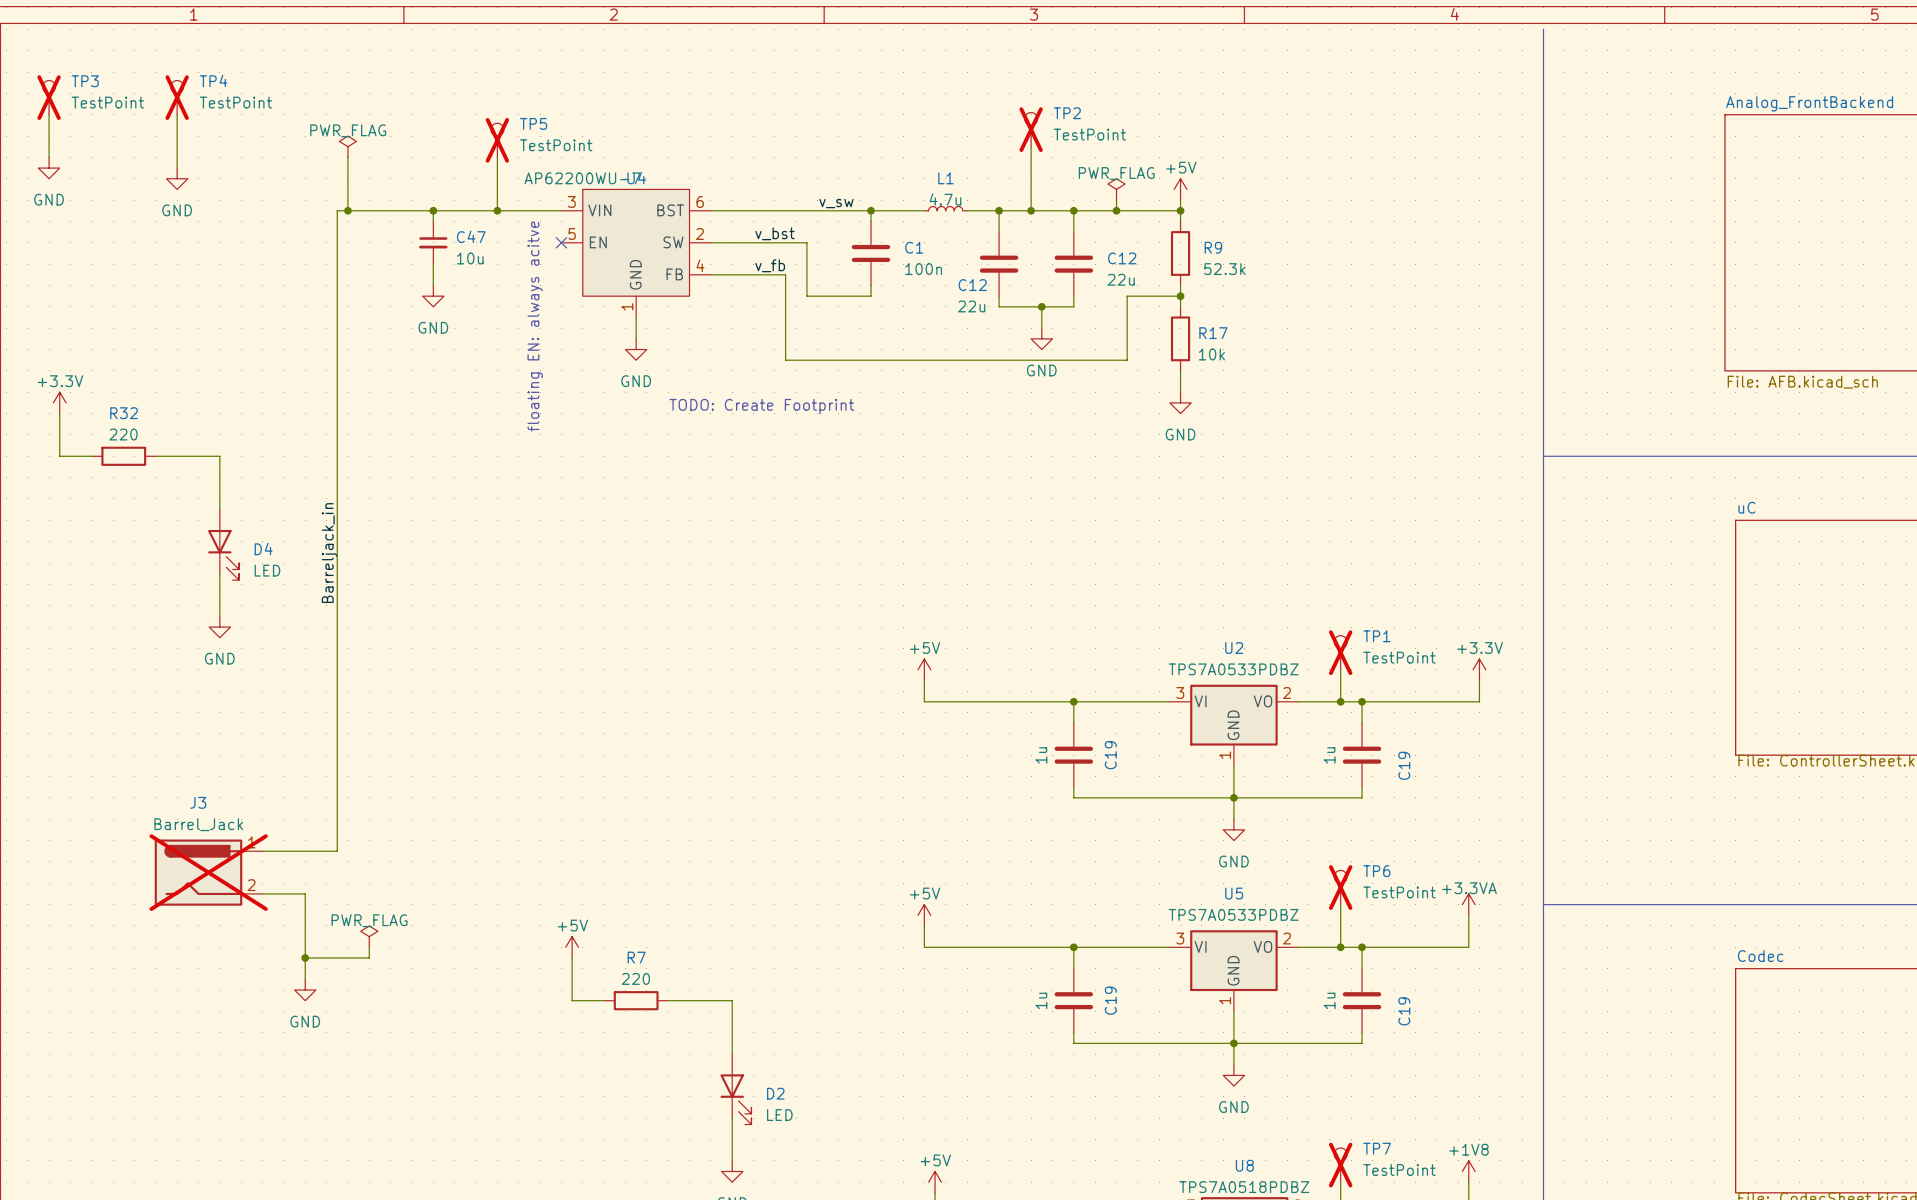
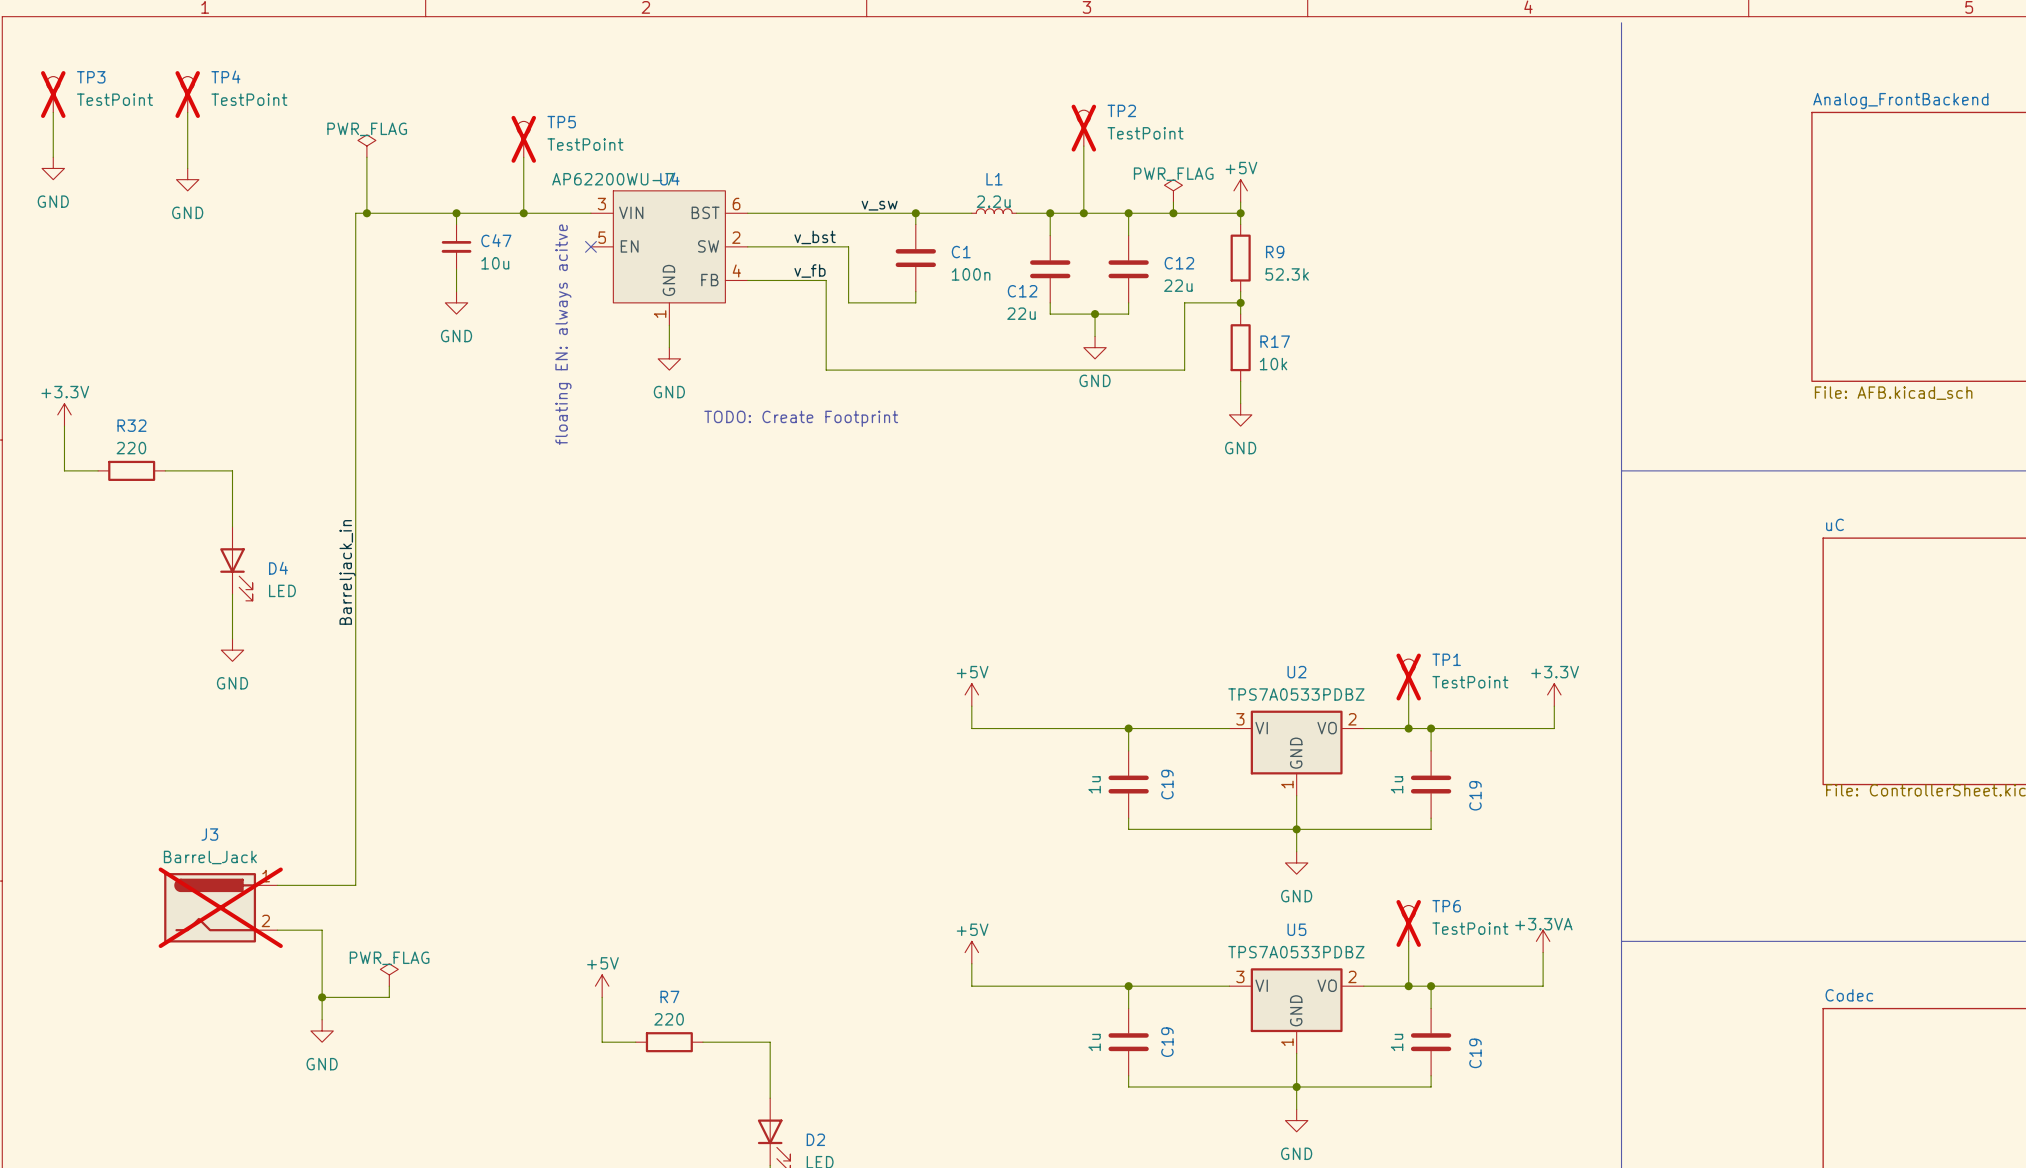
L1 value: 4.7u (945, 199) -> 2.2u (993, 201)

